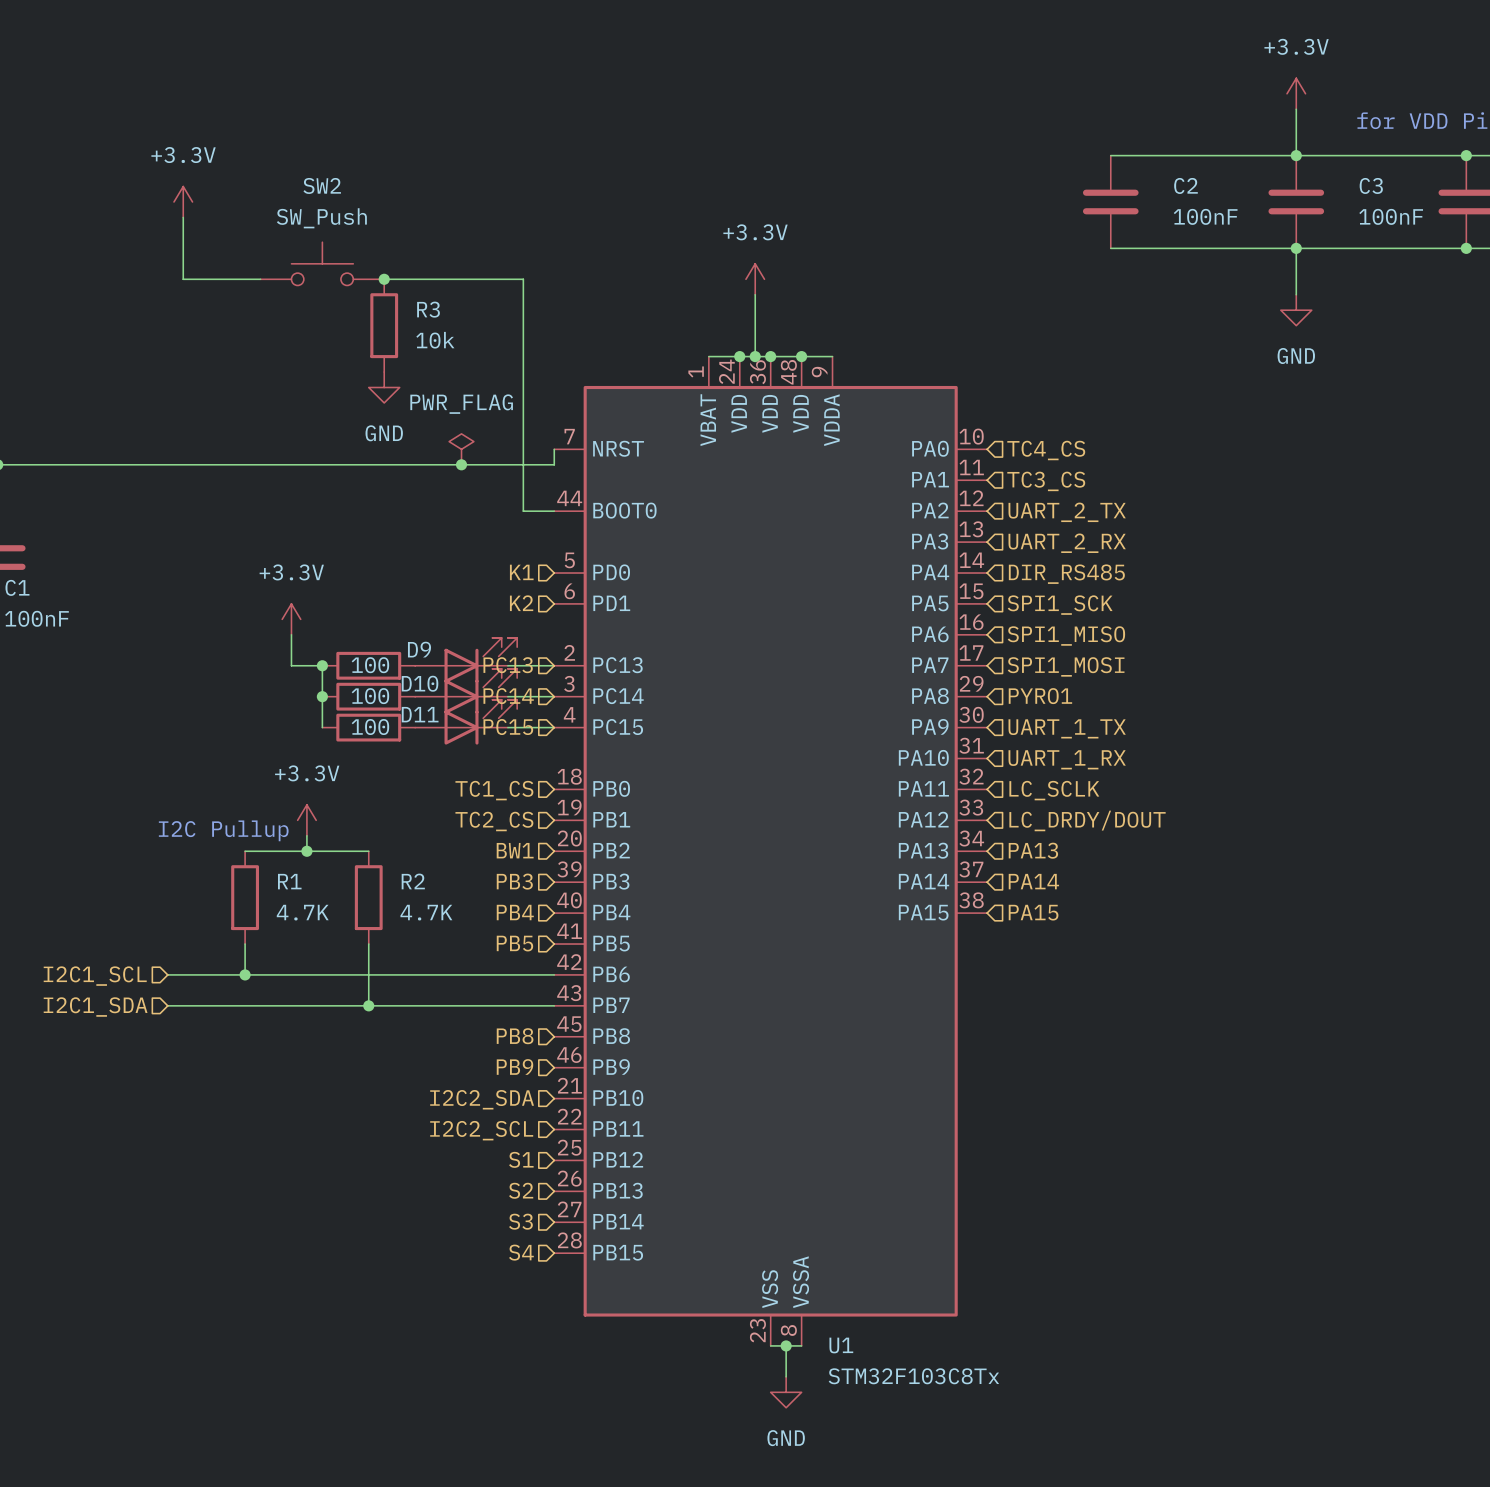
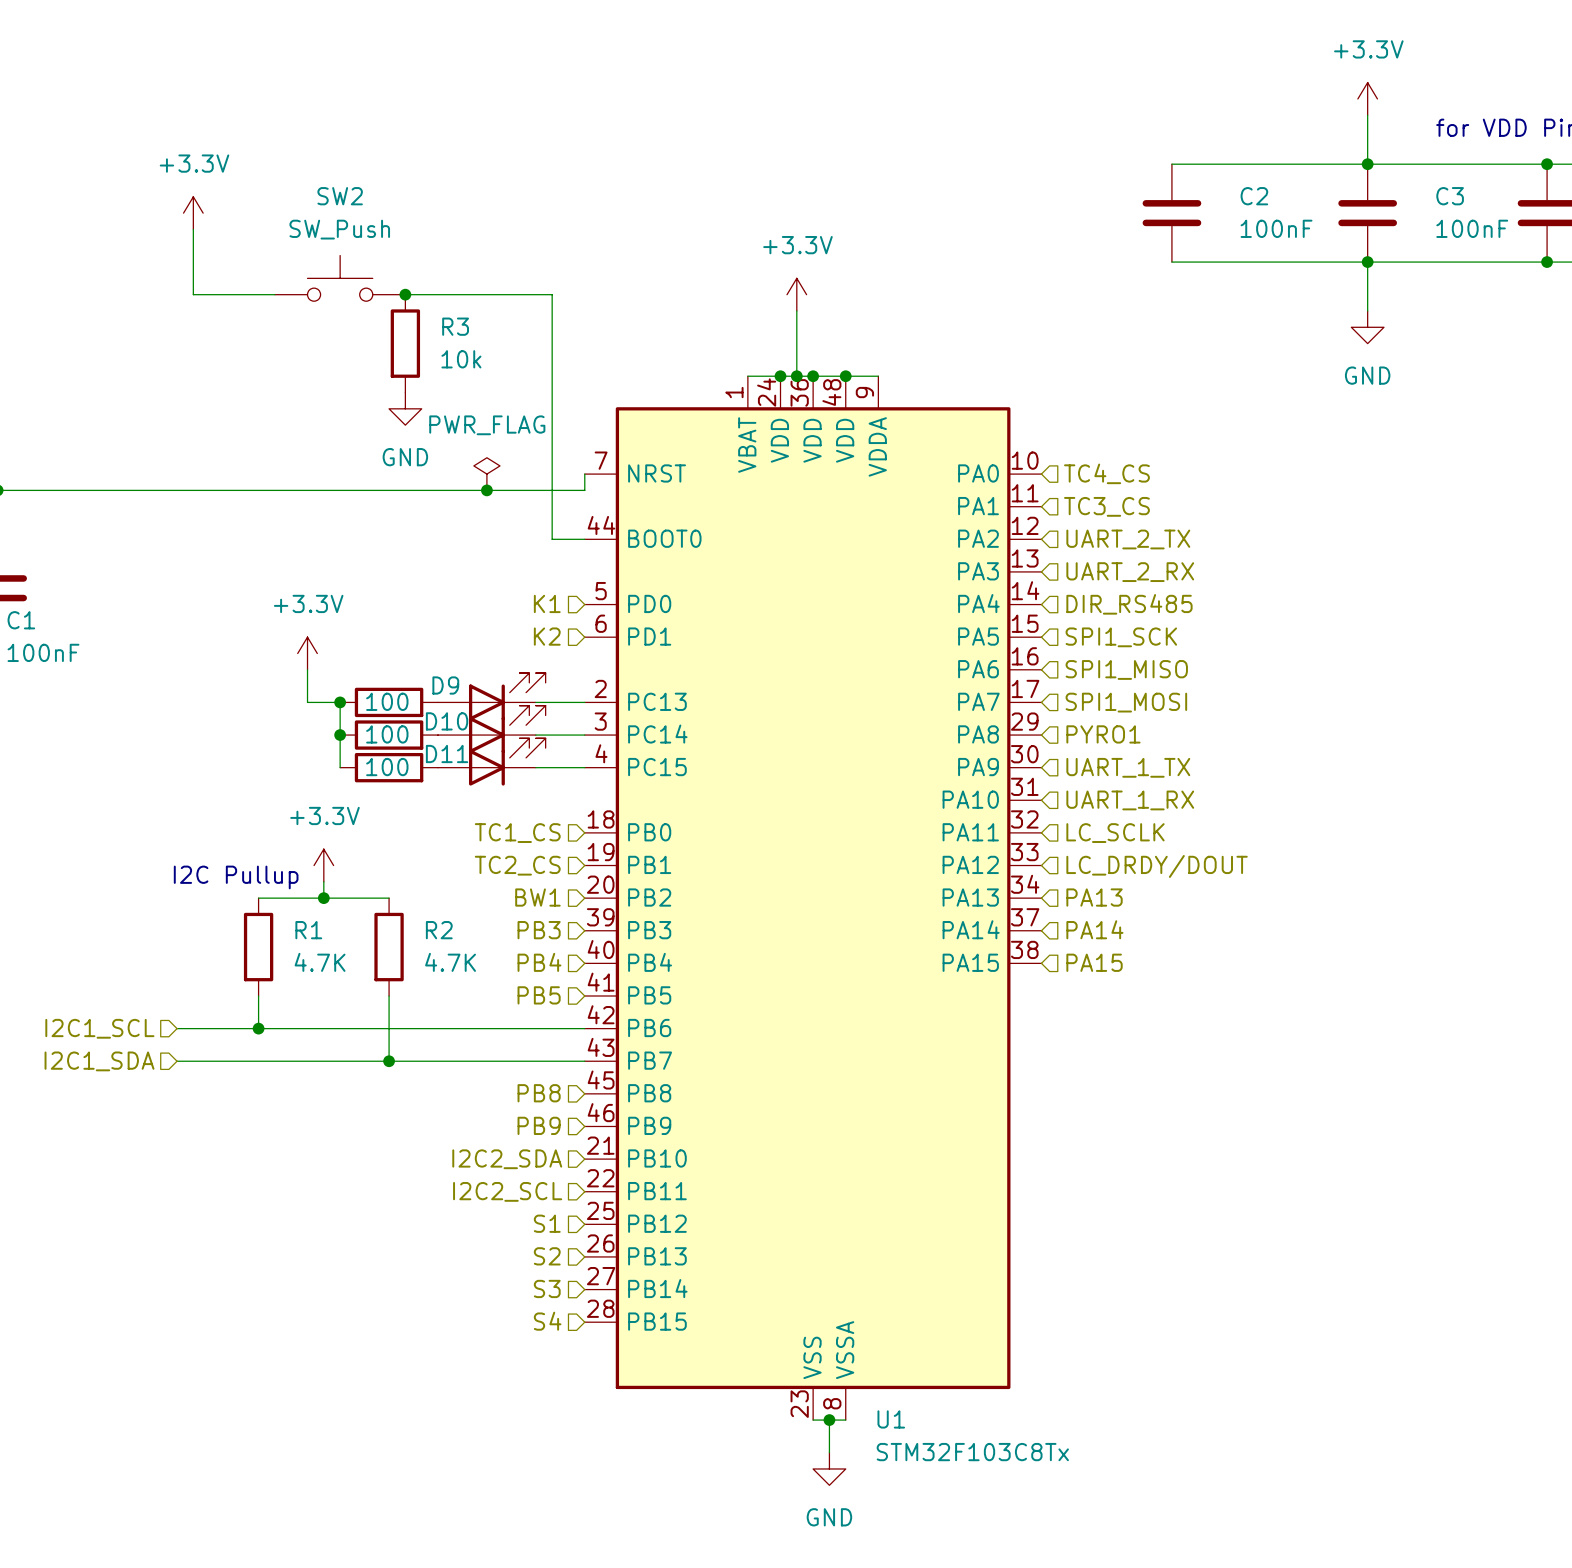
hierarchical label: PC13 (508, 665) -> none
hierarchical label: PC14 (508, 696) -> none
hierarchical label: PC15 (508, 727) -> none

